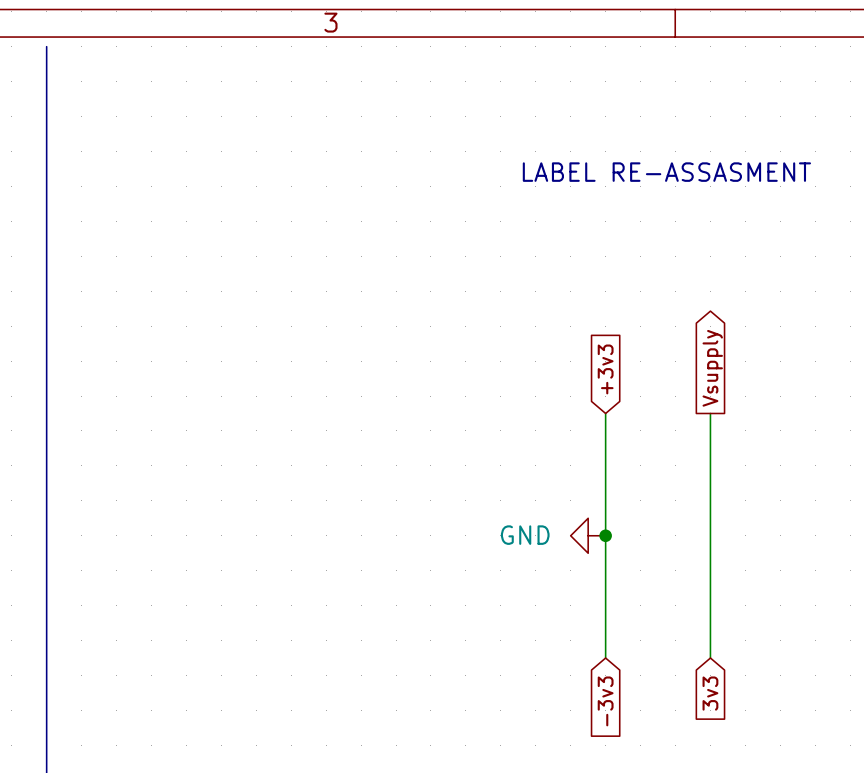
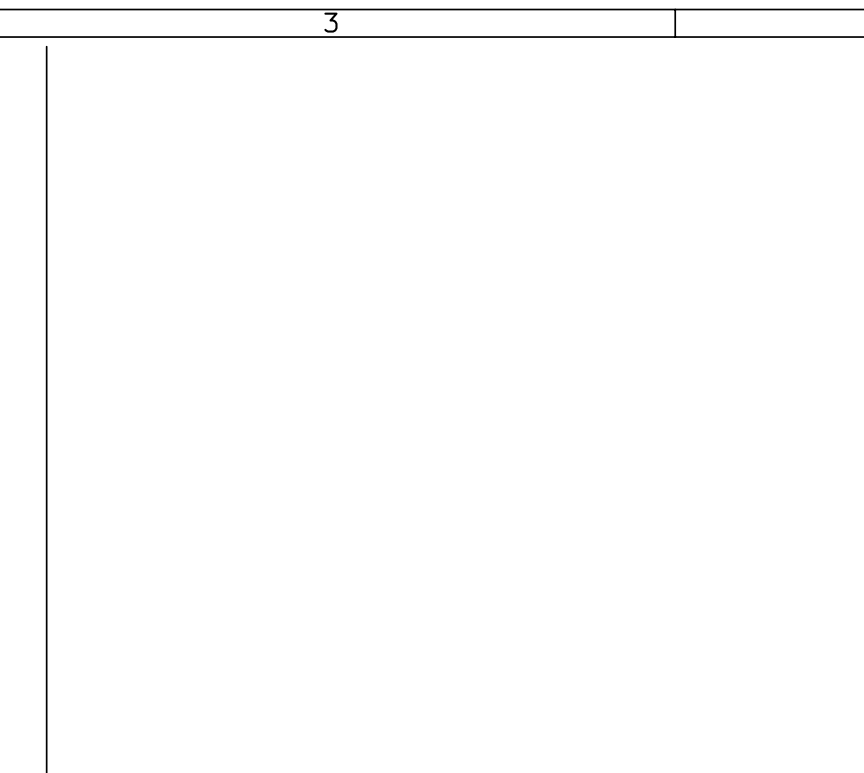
text: LABEL RE-ASSASMENT (666, 172) -> none
global label: Vsupply (712, 368) -> none
global label: +3v3 (605, 369) -> none
wire: (605, 413) (605, 658) -> none
wire: (710, 413) (710, 658) -> none
power symbol: GND (588, 535) -> none
junction: (605, 535) -> none
global label: 3v3 (710, 693) -> none
global label: -3v3 (605, 701) -> none

